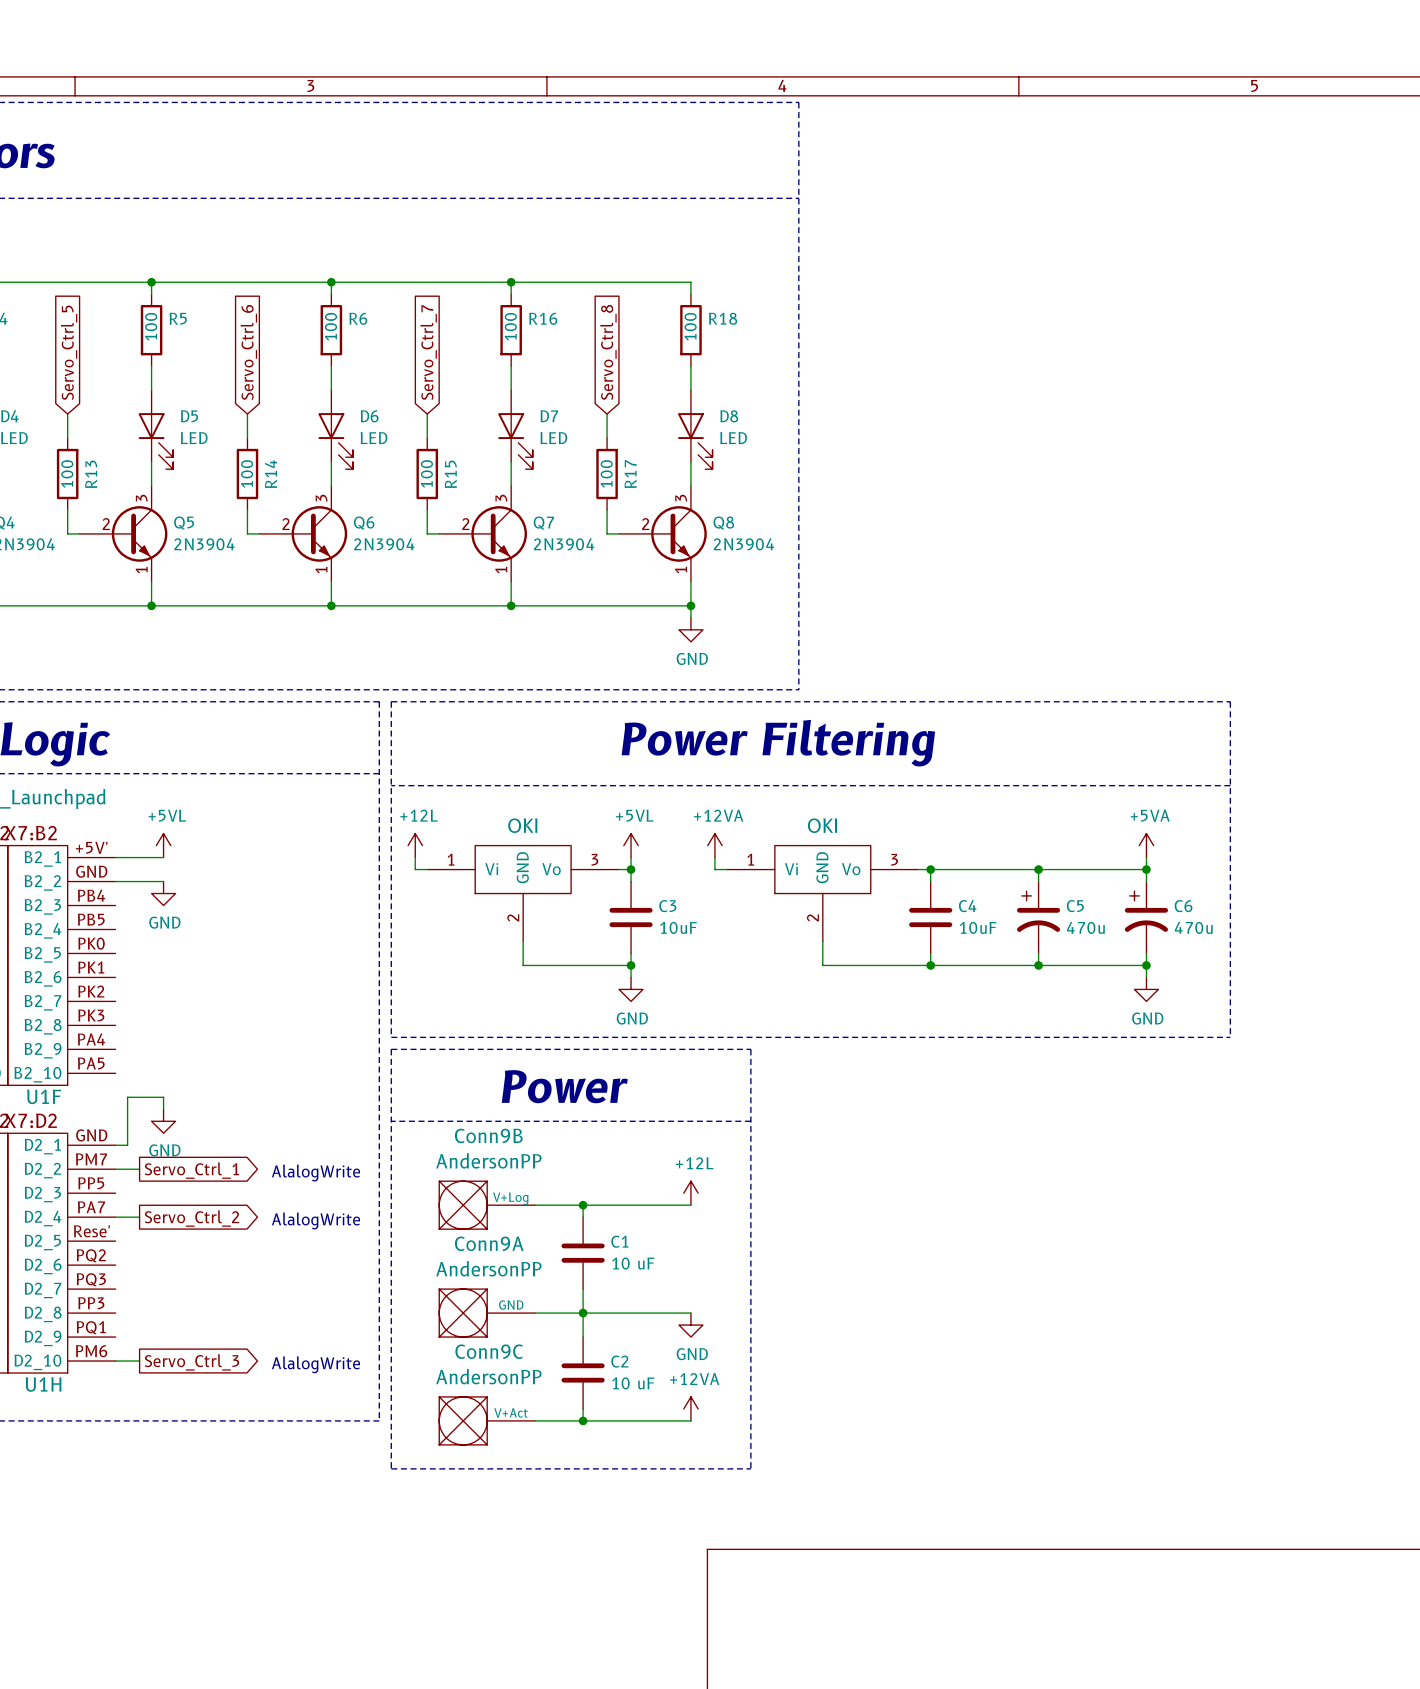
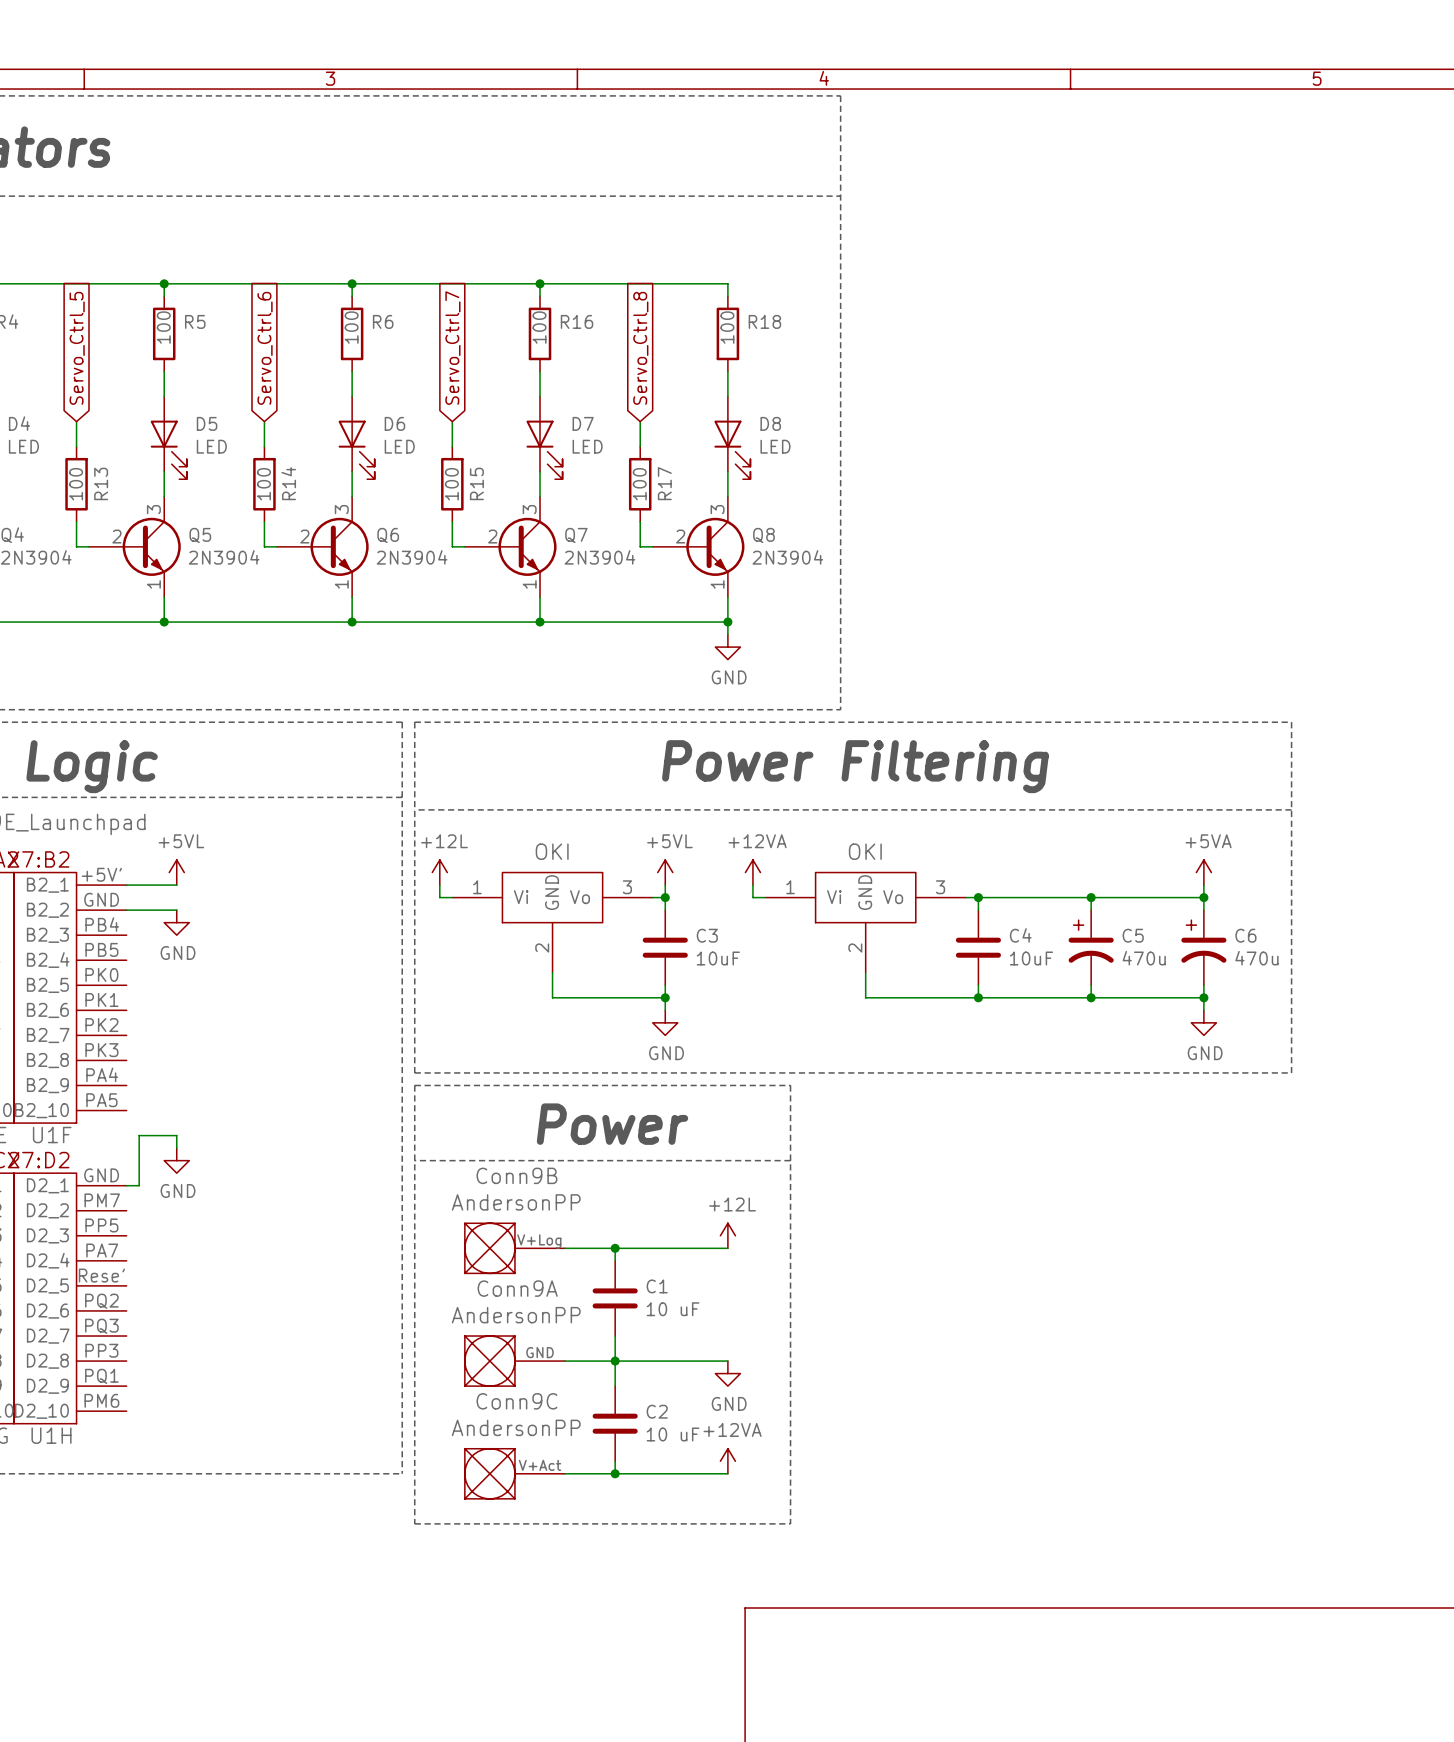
wire: (115, 1169) (139, 1169) -> none
global label: Servo_Ctrl_1 (191, 1170) -> none
text: AlalogWrite (316, 1173) -> none
wire: (115, 1217) (139, 1217) -> none
global label: Servo_Ctrl_2 (191, 1218) -> none
text: AlalogWrite (316, 1220) -> none
wire: (115, 1361) (139, 1361) -> none
global label: Servo_Ctrl_3 (191, 1362) -> none
text: AlalogWrite (316, 1364) -> none

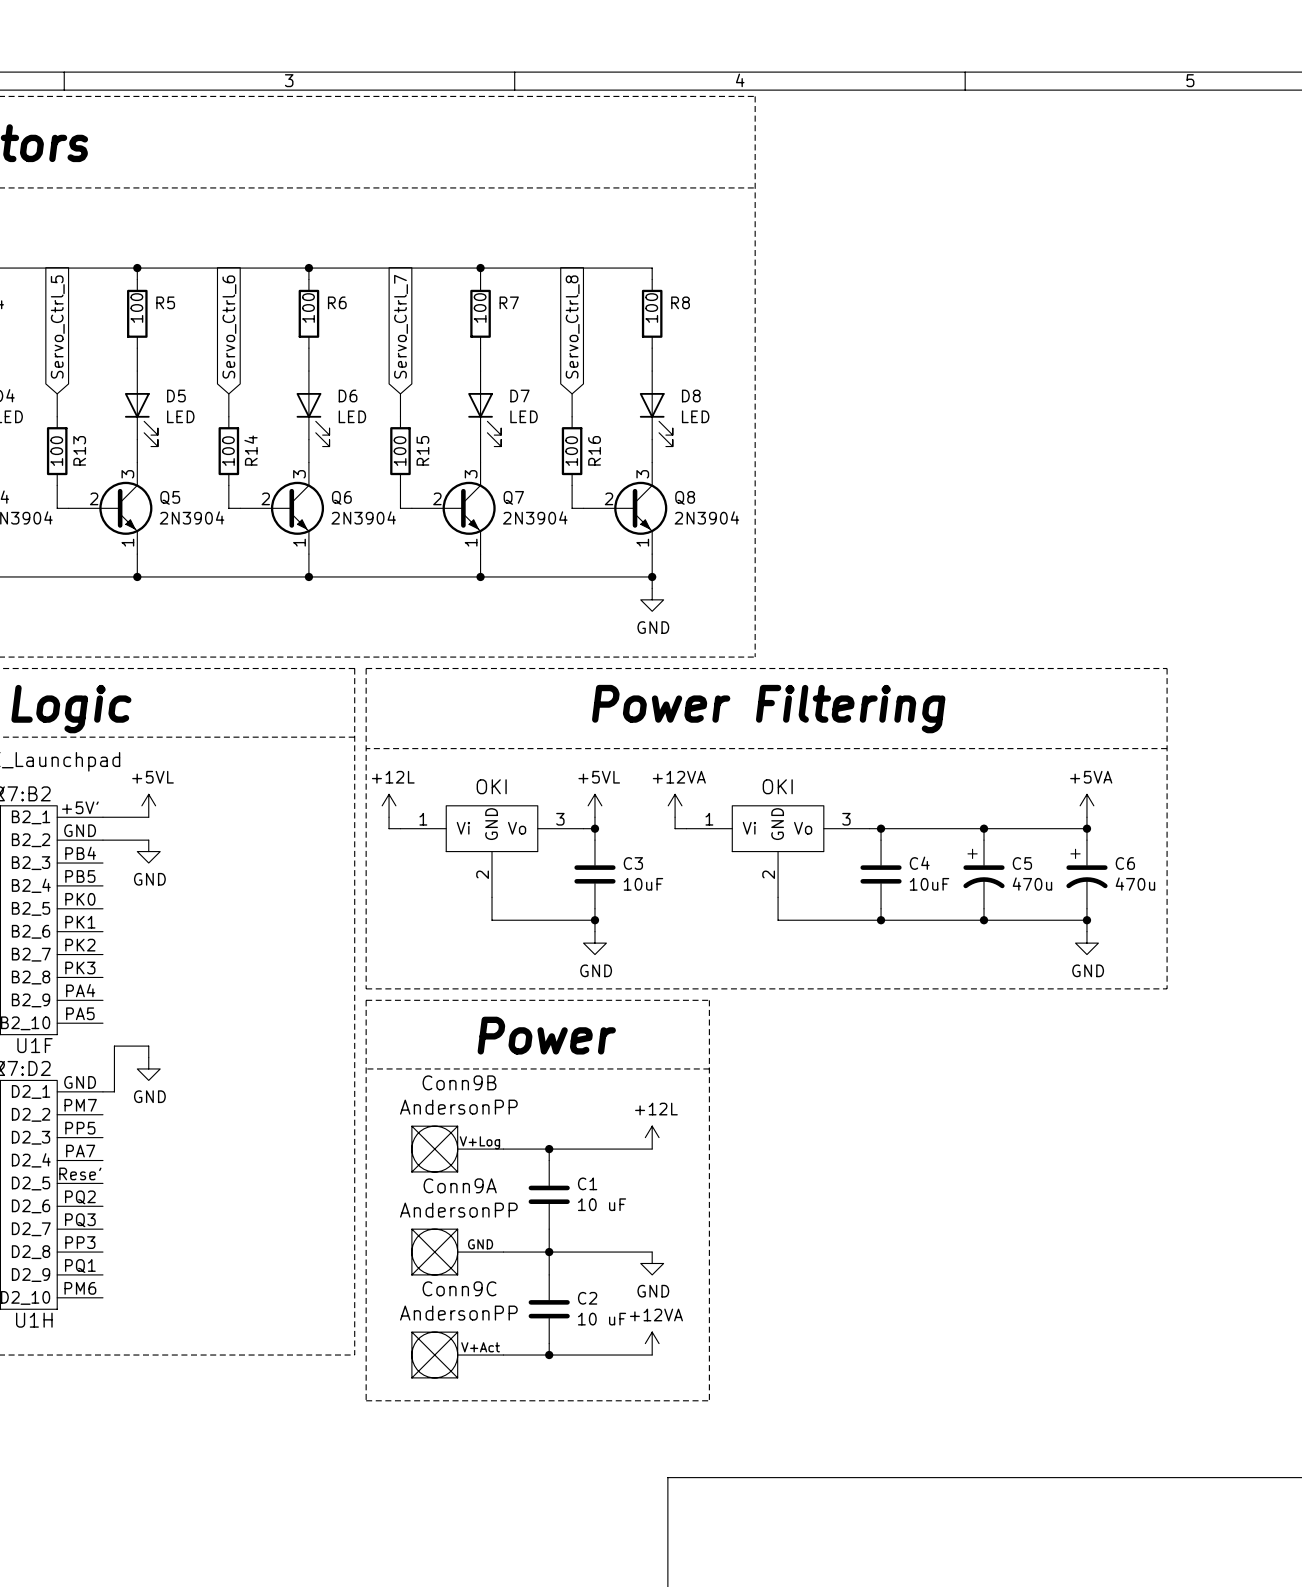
R16 name: R16 (577, 321) -> R7 (509, 302)
R18 name: R18 (764, 321) -> R8 (680, 302)
R17 name: R17 (664, 483) -> R16 (594, 450)

